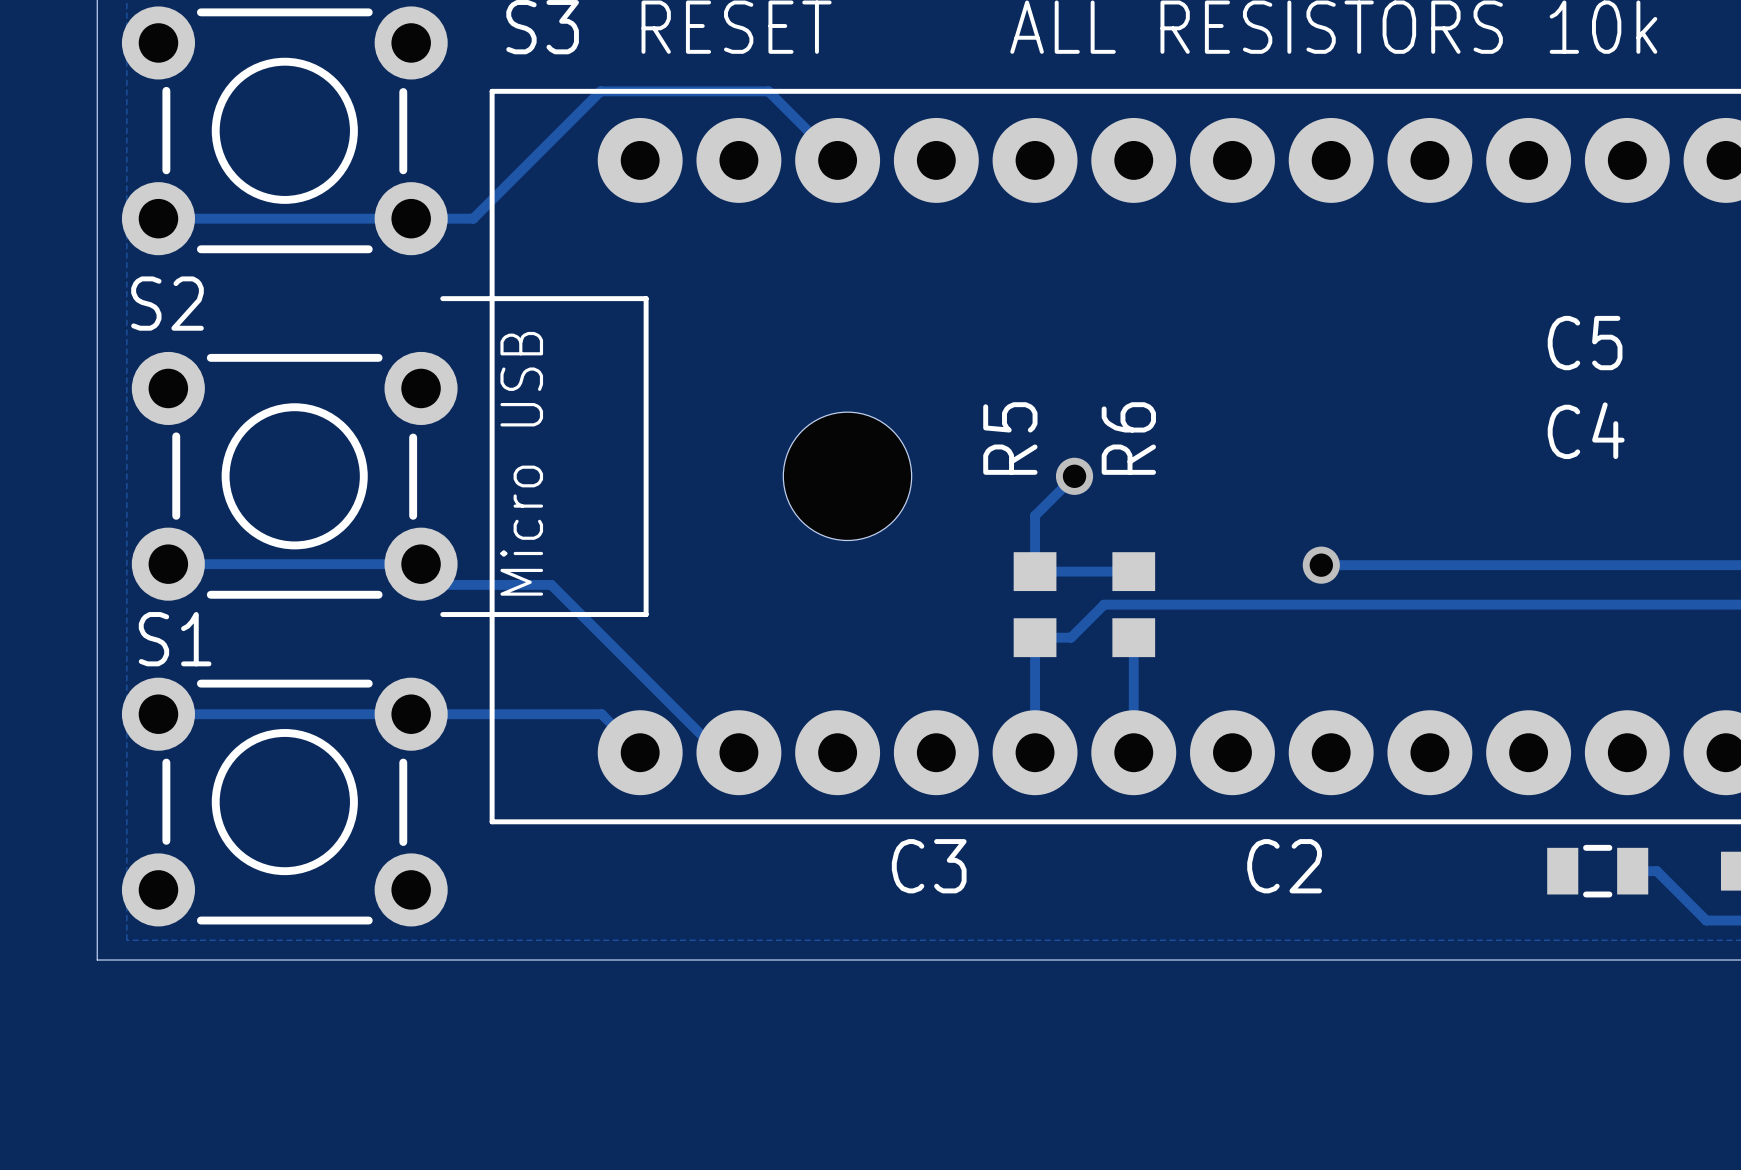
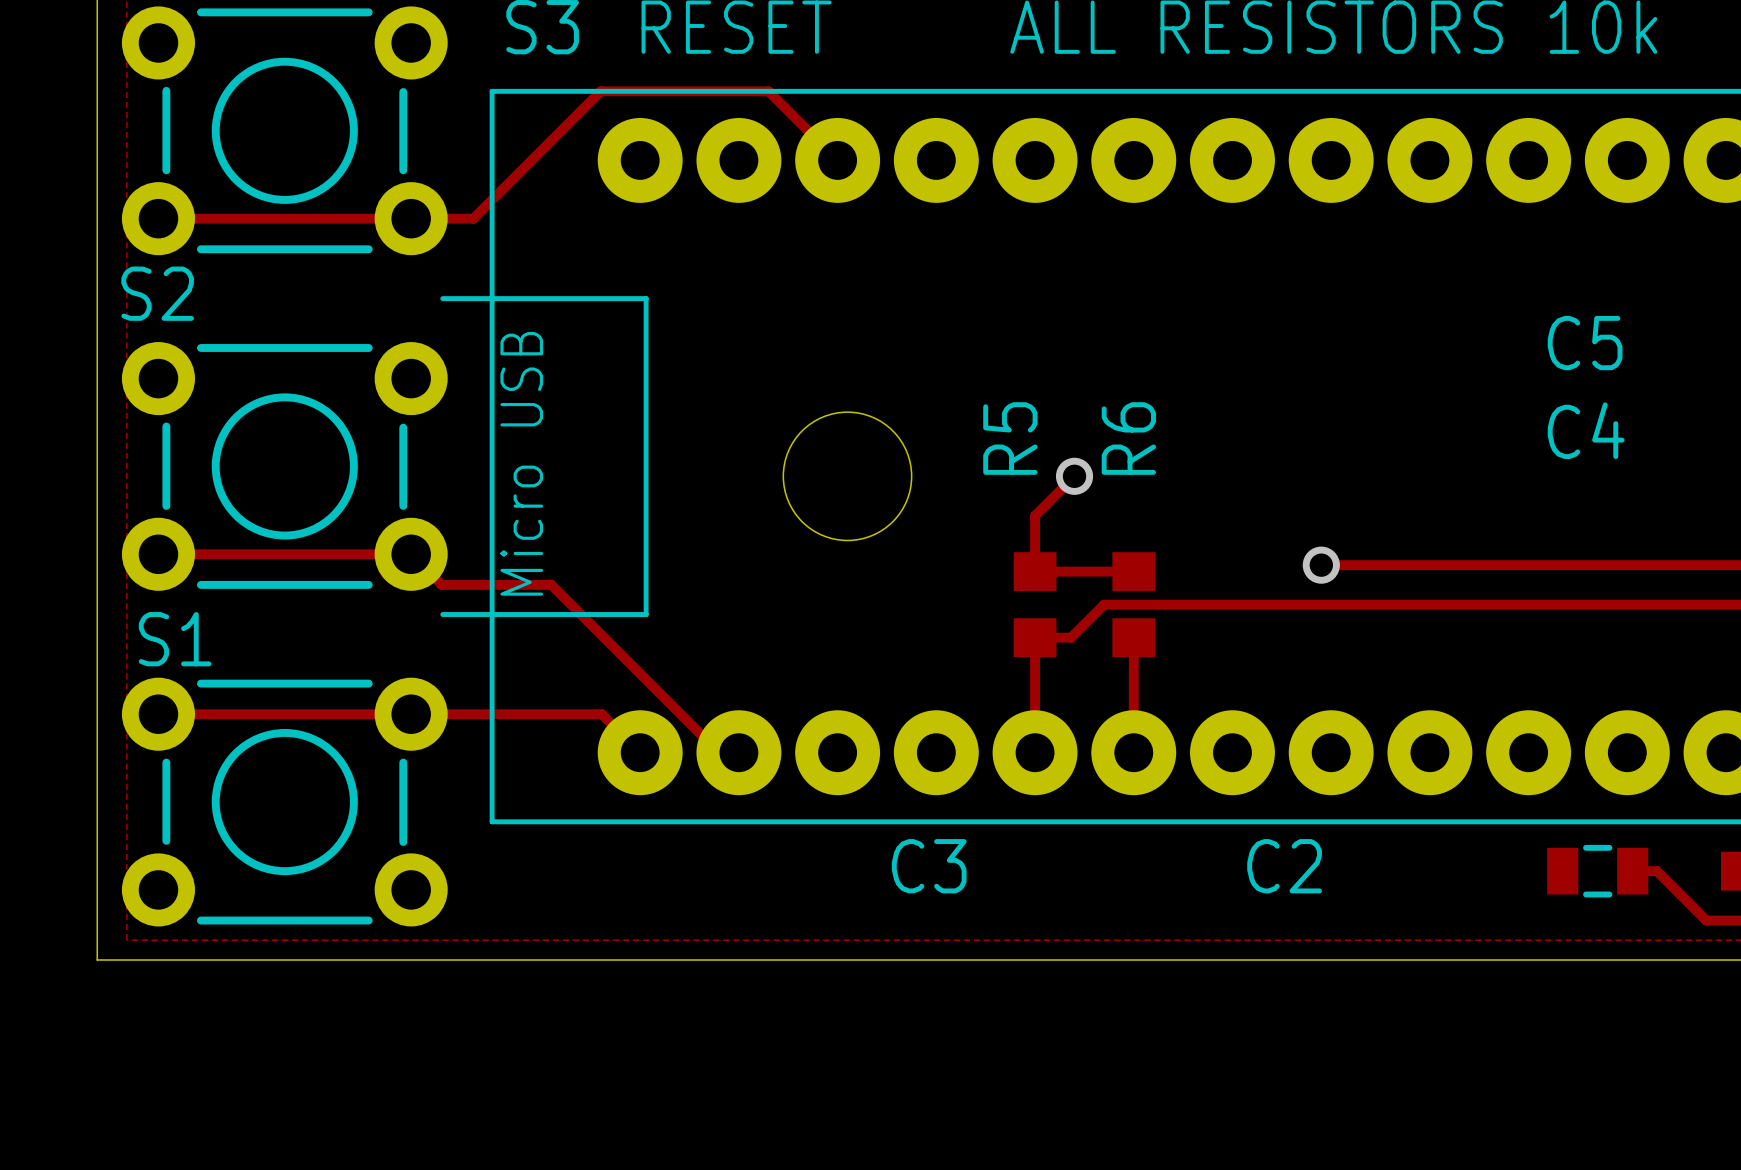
S2 position: (294, 476) -> (284, 466)
track: (168, 564) (421, 564) -> (158, 554) (411, 554) (421, 564)

